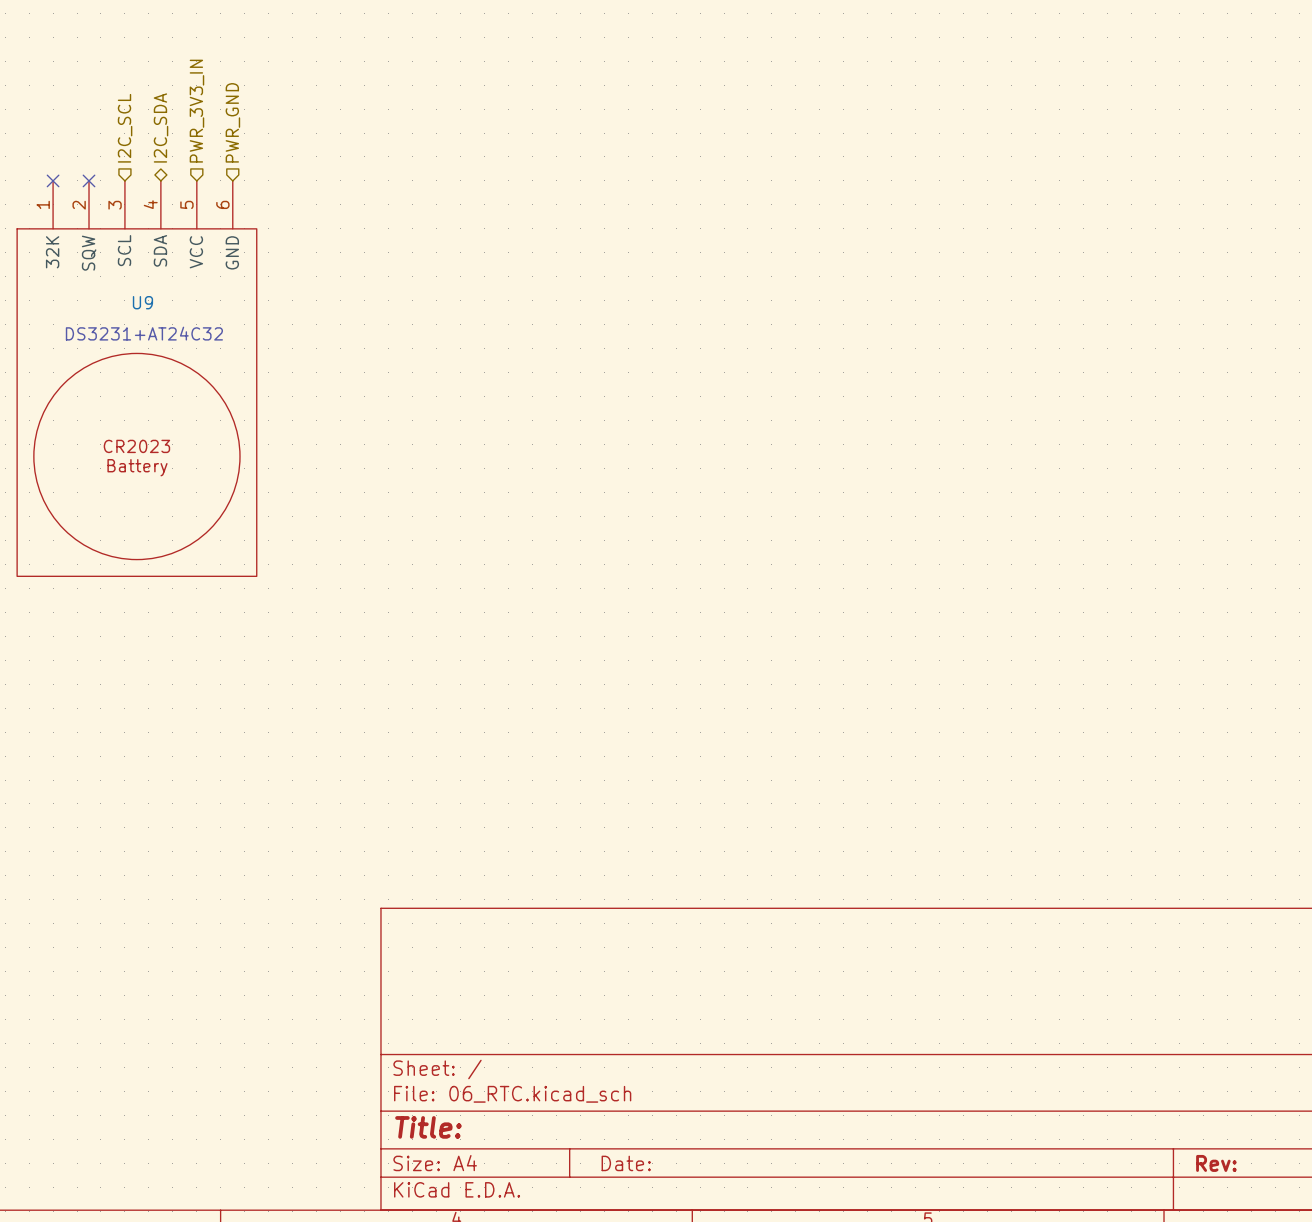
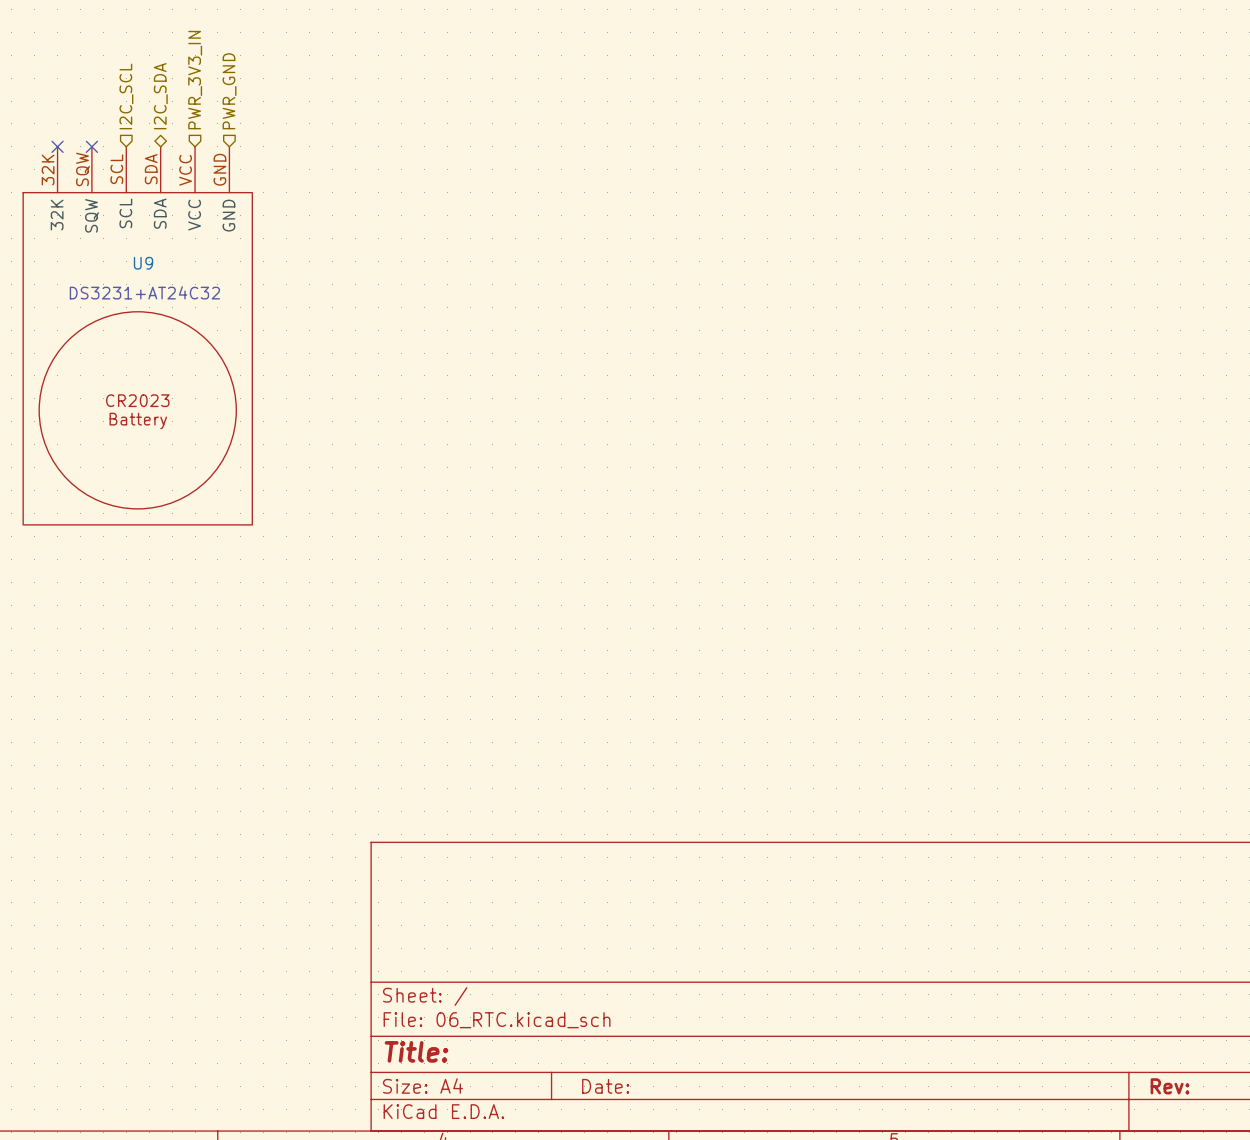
U9 pin number: 1 (43, 204) -> 32K (48, 170)
U9 pin number: 4 (150, 204) -> SDA (151, 169)
U9 pin number: 5 (186, 204) -> VCC (185, 170)
U9 pin number: 6 (222, 204) -> GND (219, 169)
U9 pin number: 2 (79, 205) -> SQW (83, 169)
U9 pin number: 3 (115, 205) -> SCL (116, 169)

